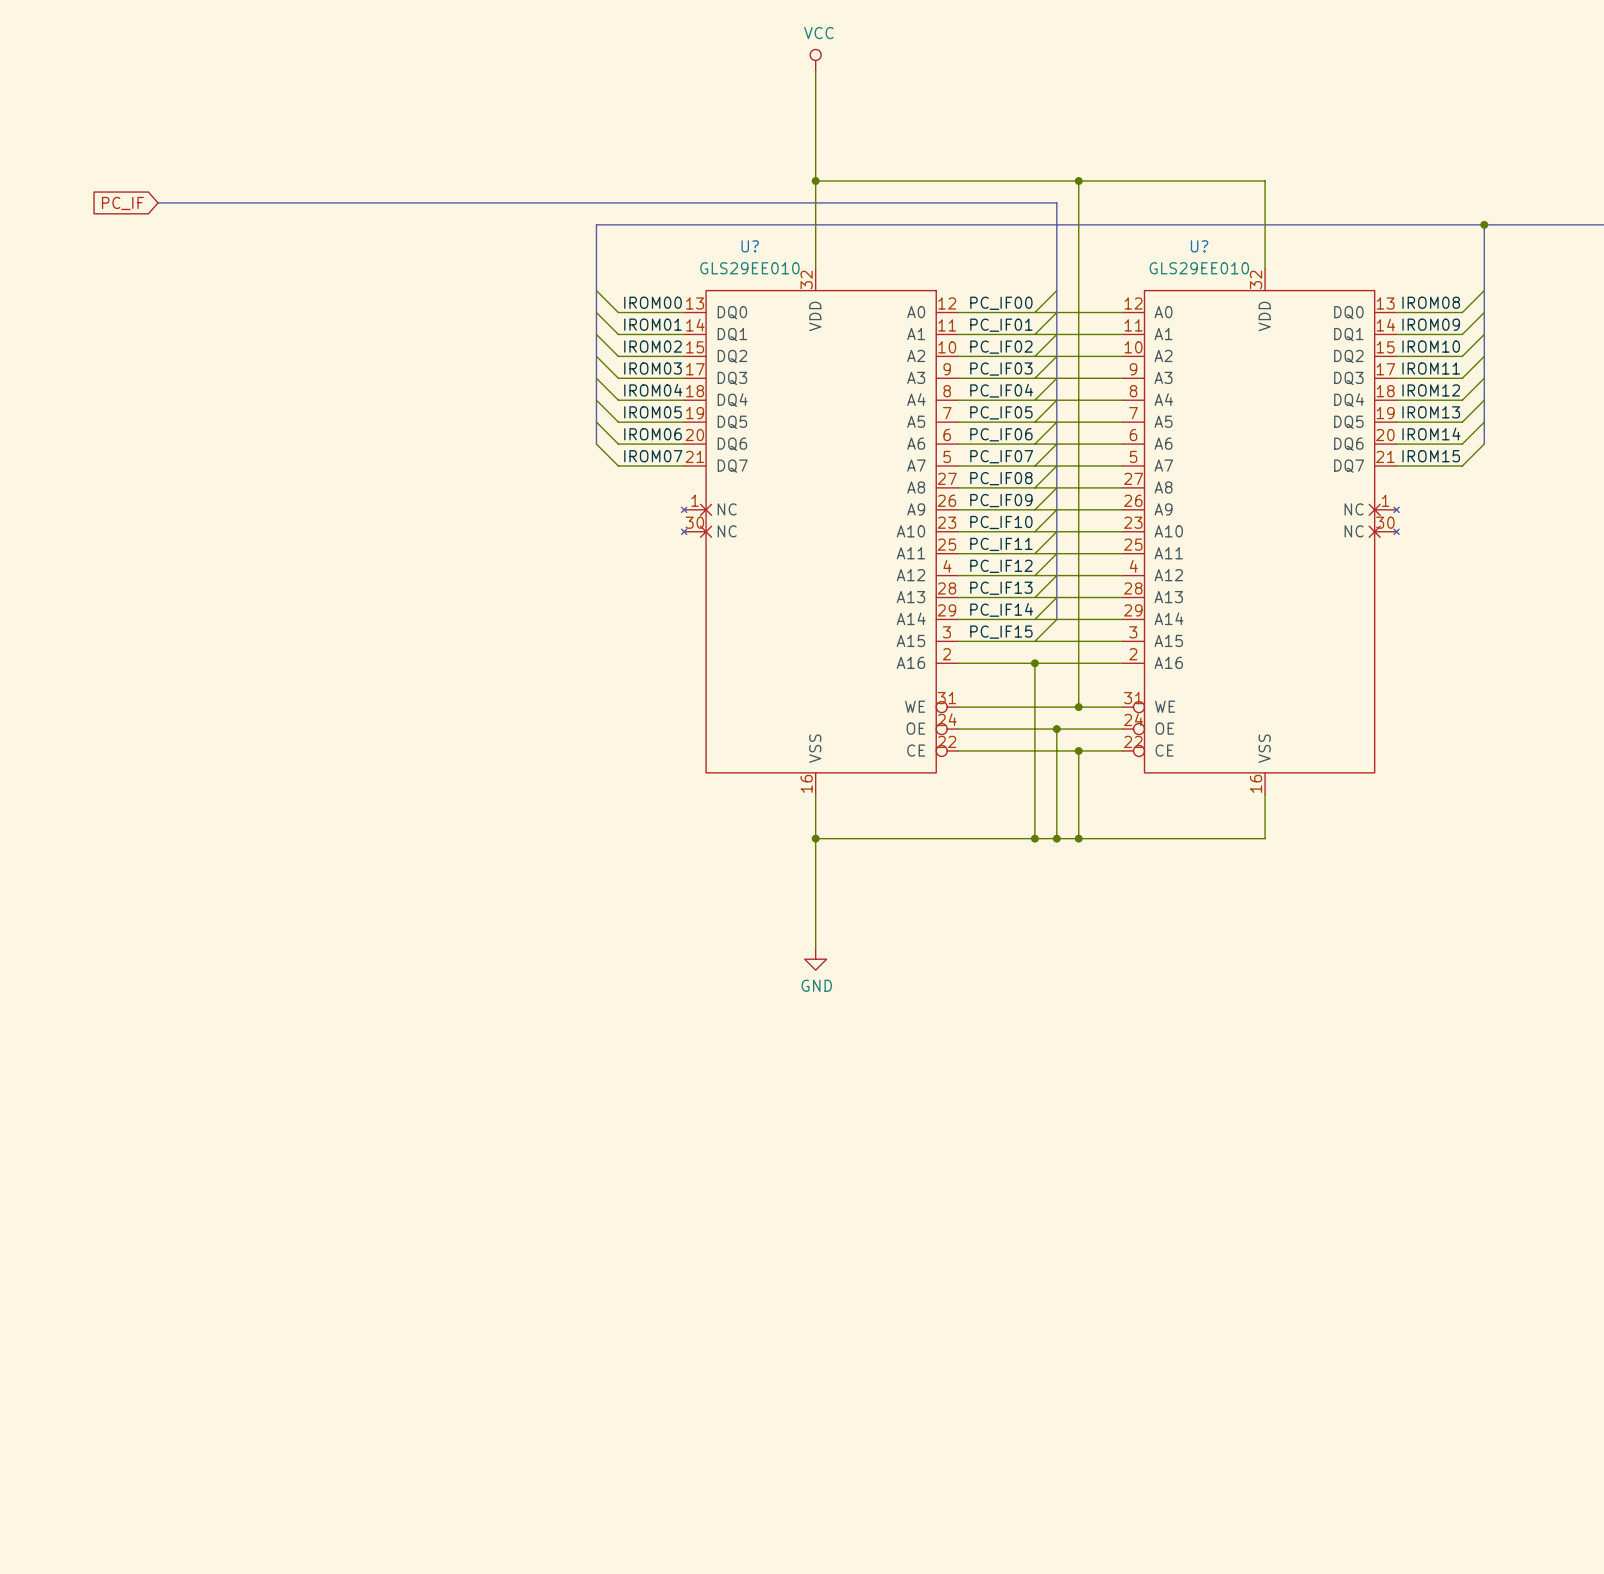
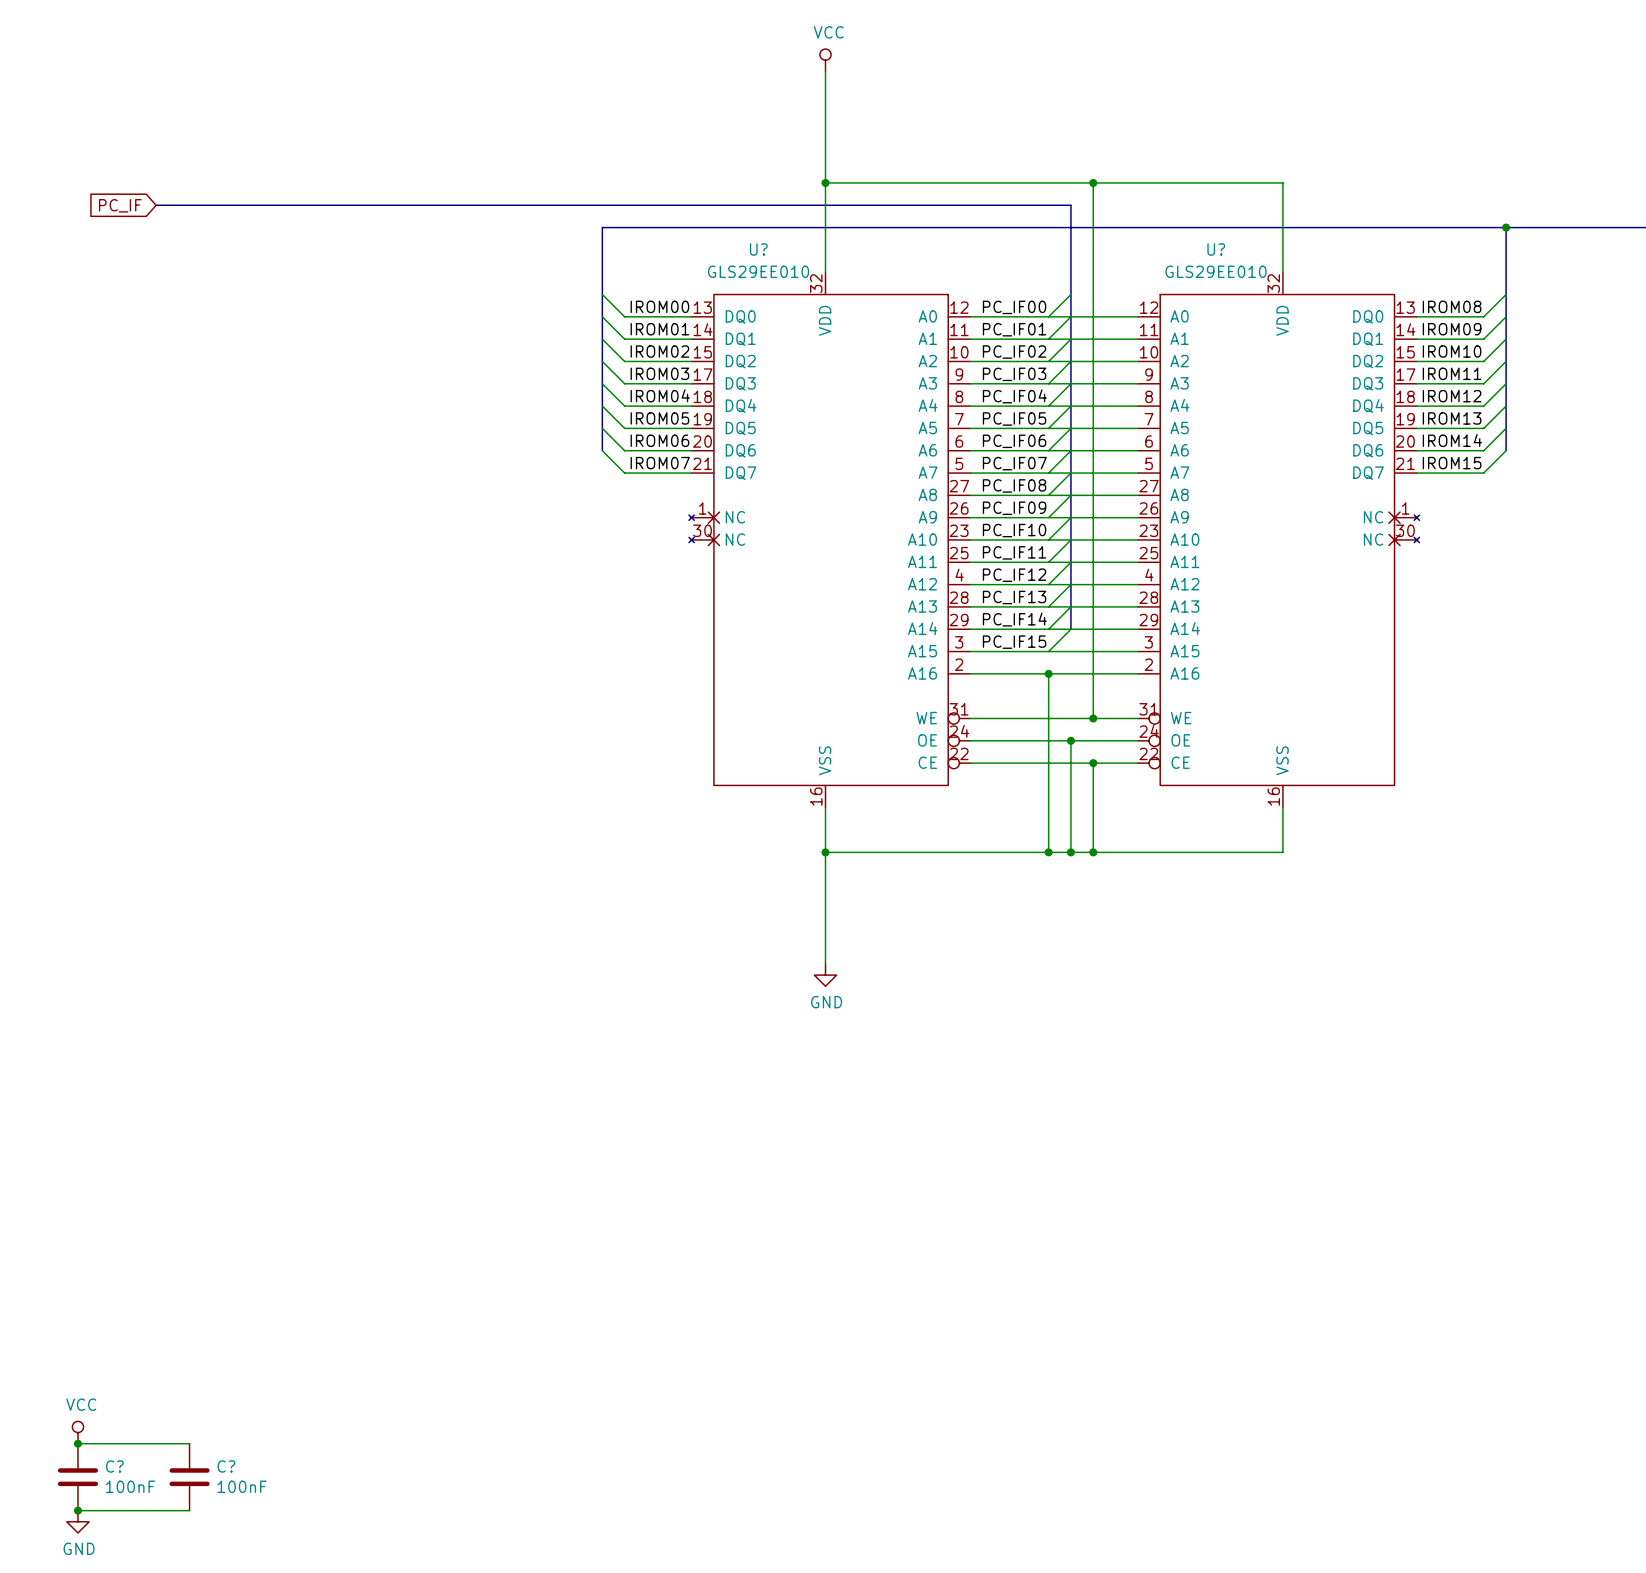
power symbol: none -> VCC (77, 1432)
wire: none -> (77, 1443) (189, 1443)
junction: none -> (77, 1443)
C?: none -> 100nF (77, 1477)
C?: none -> 100nF (189, 1477)
wire: none -> (77, 1510) (189, 1510)
junction: none -> (77, 1510)
power symbol: none -> GND (77, 1521)

